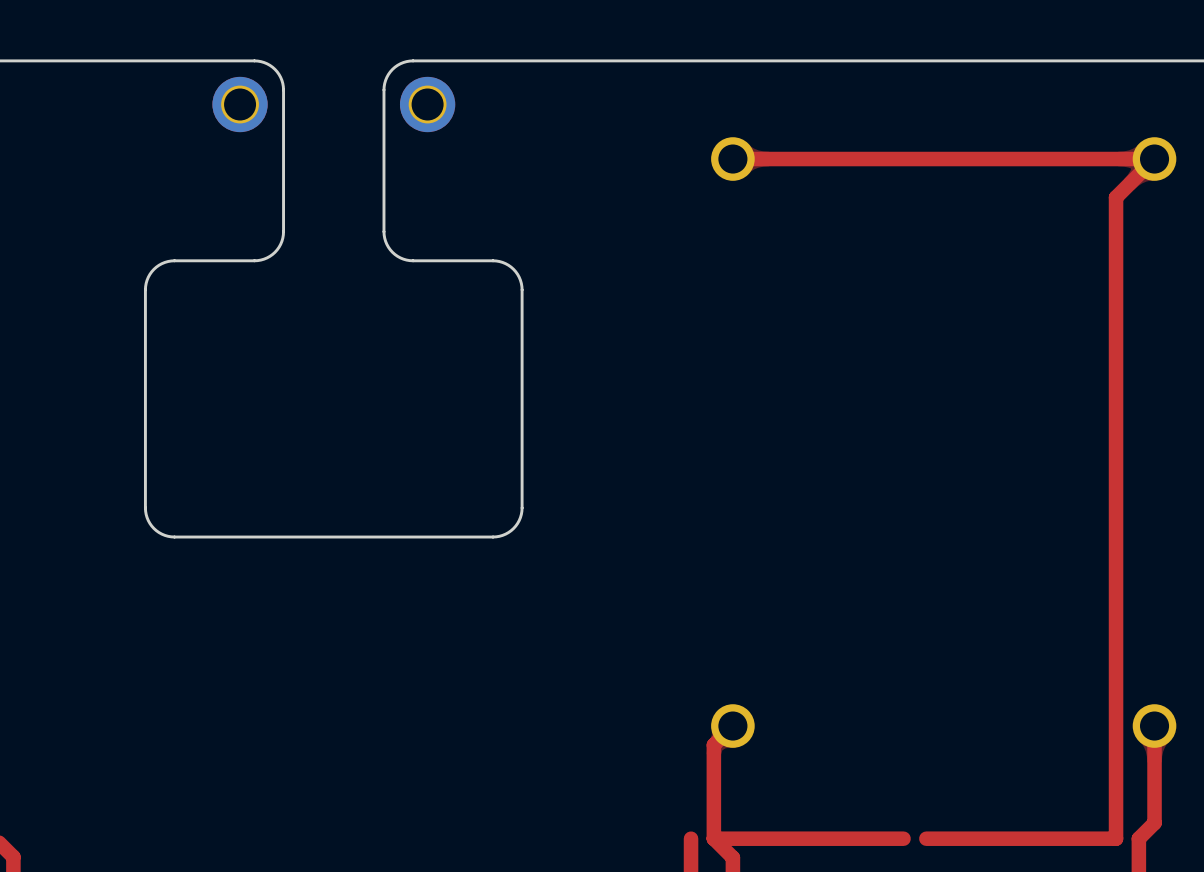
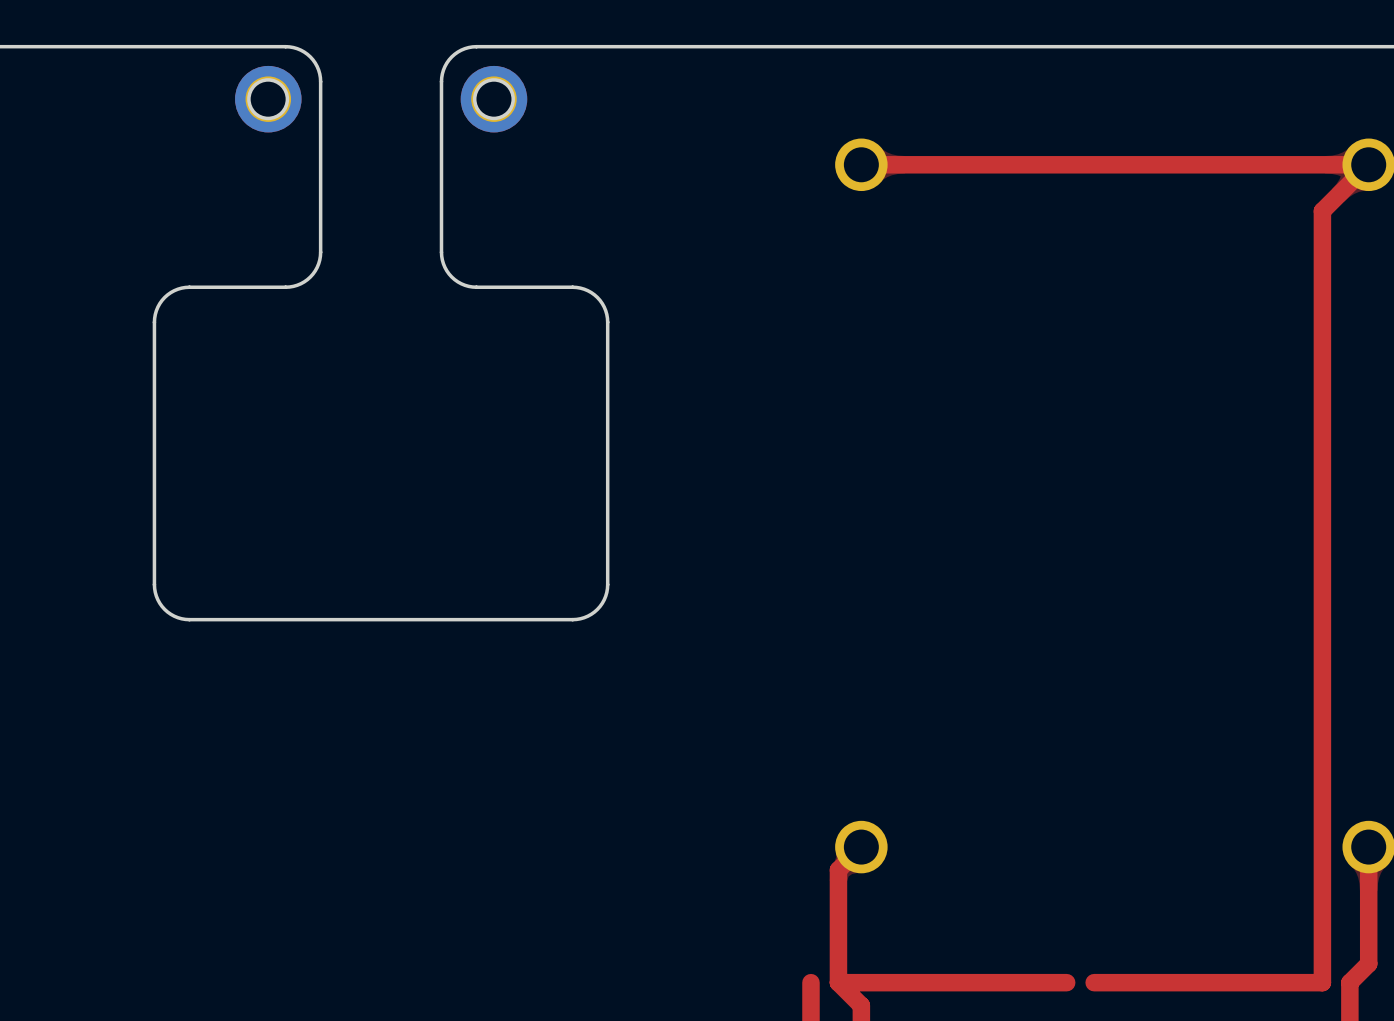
round board edge: none -> [247, 78, 290, 121]
round board edge: none -> [472, 78, 515, 121]

